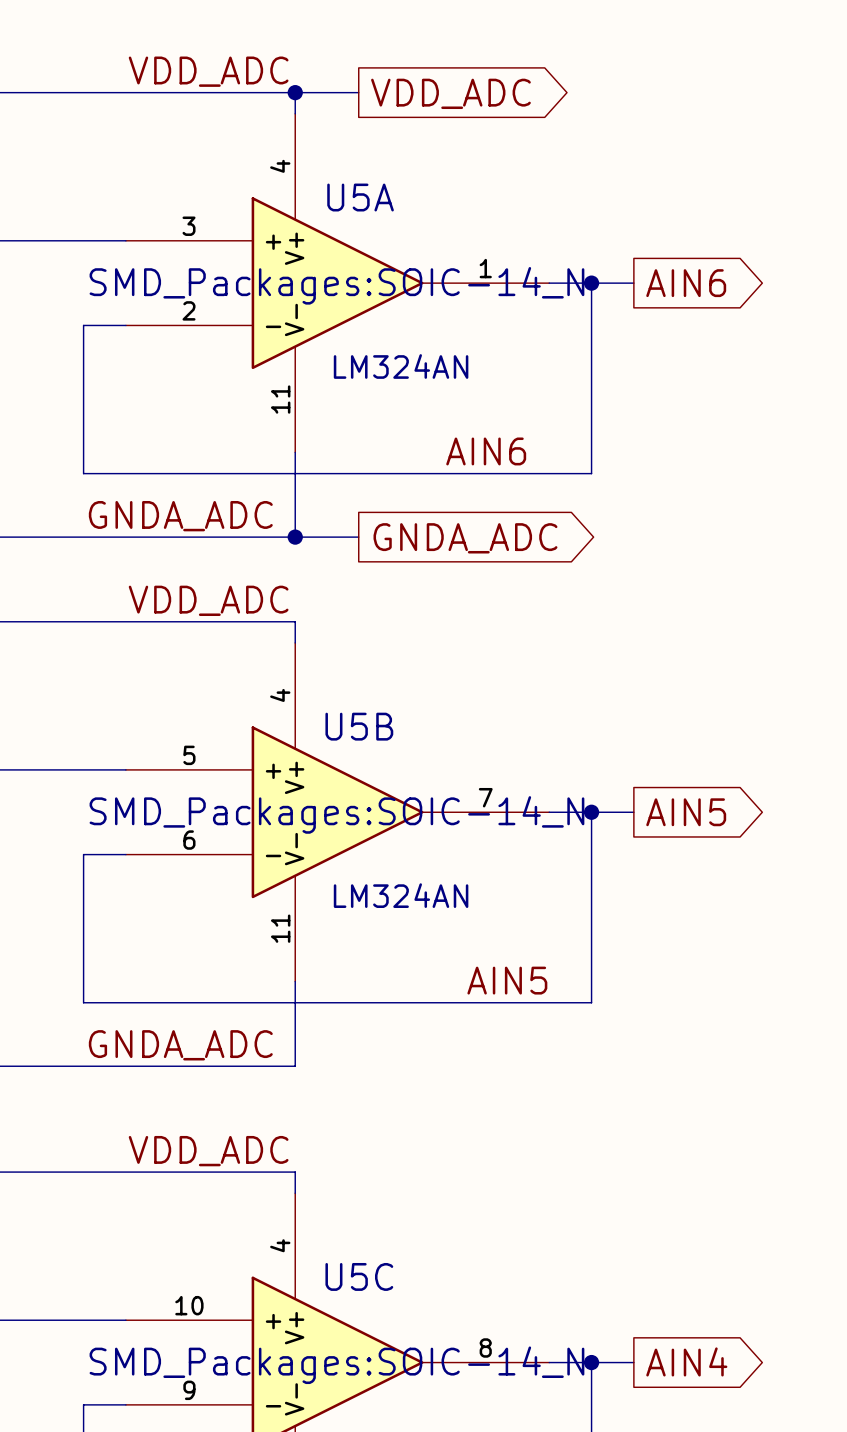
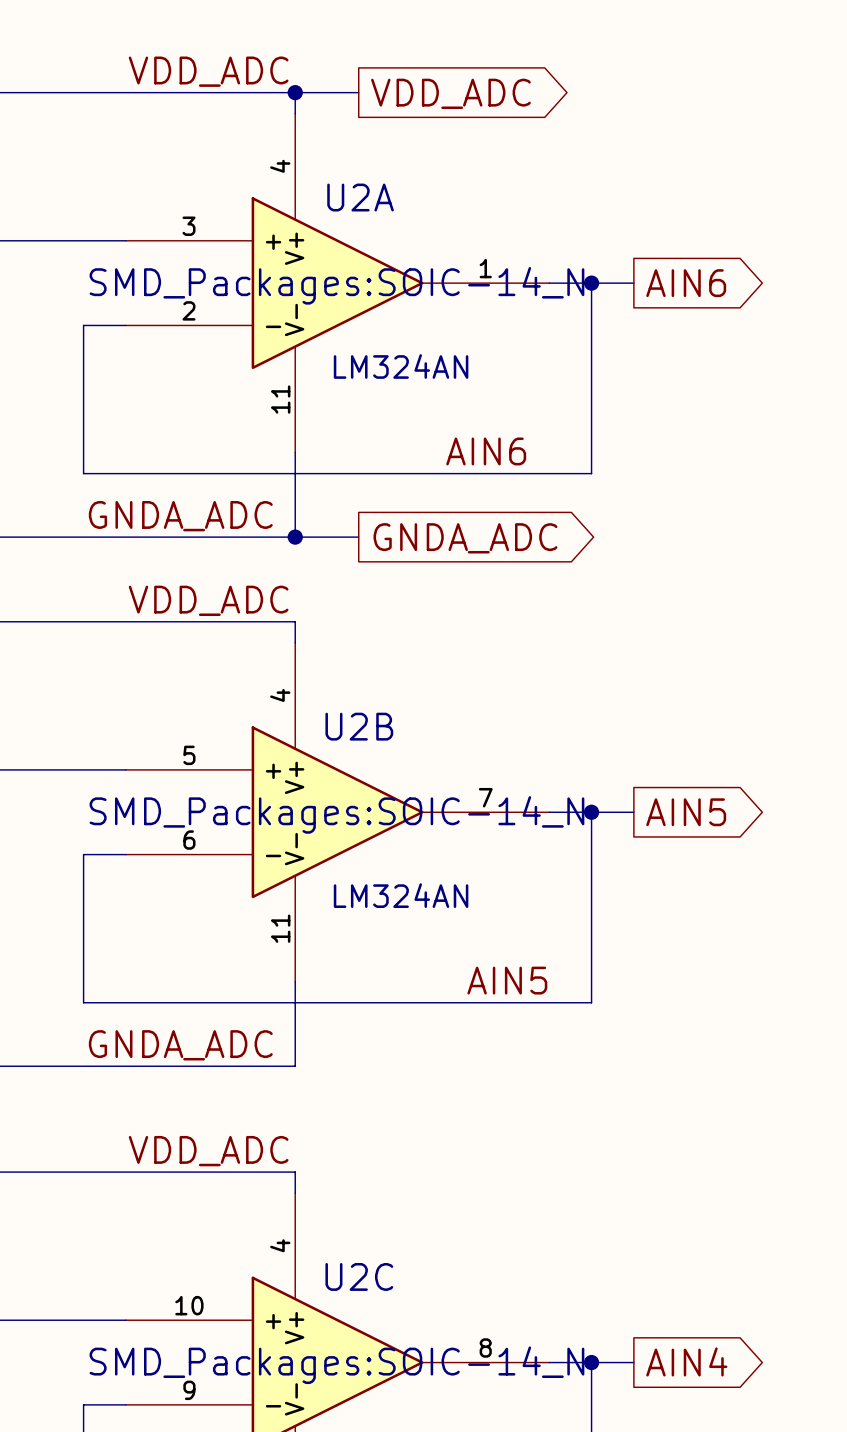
U5A name: U5A (360, 197) -> U2A (360, 197)
U5B name: U5B (359, 726) -> U2B (359, 726)
U5C name: U5C (359, 1276) -> U2C (359, 1276)

